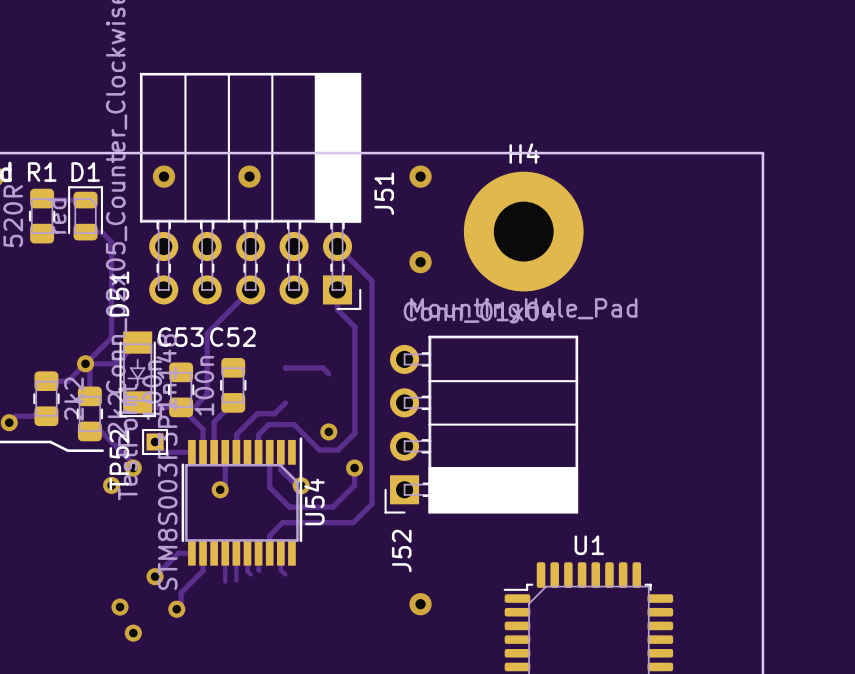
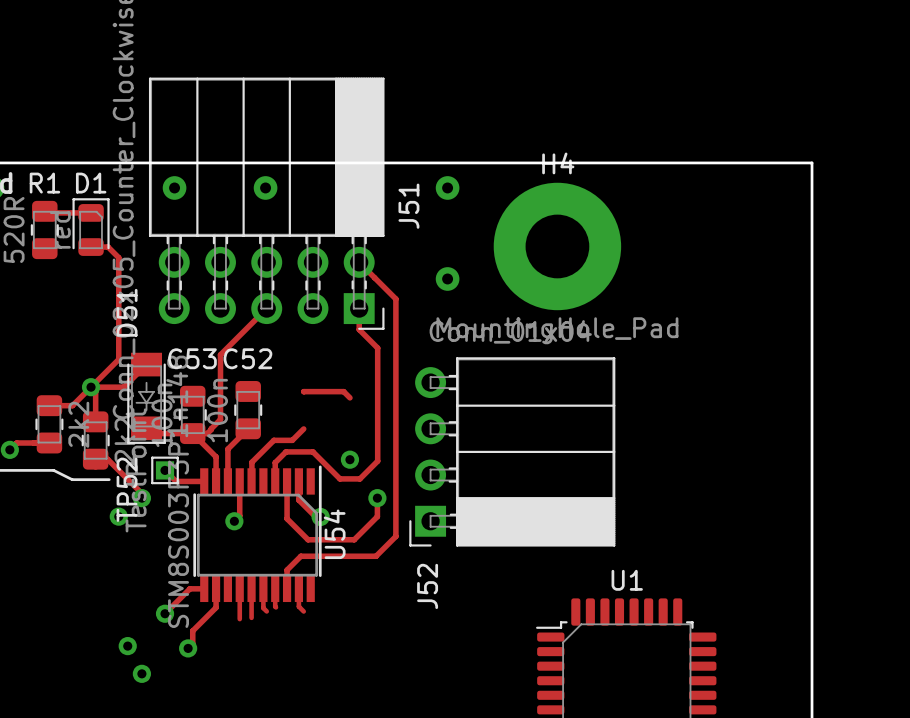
via: (420, 604) -> none

